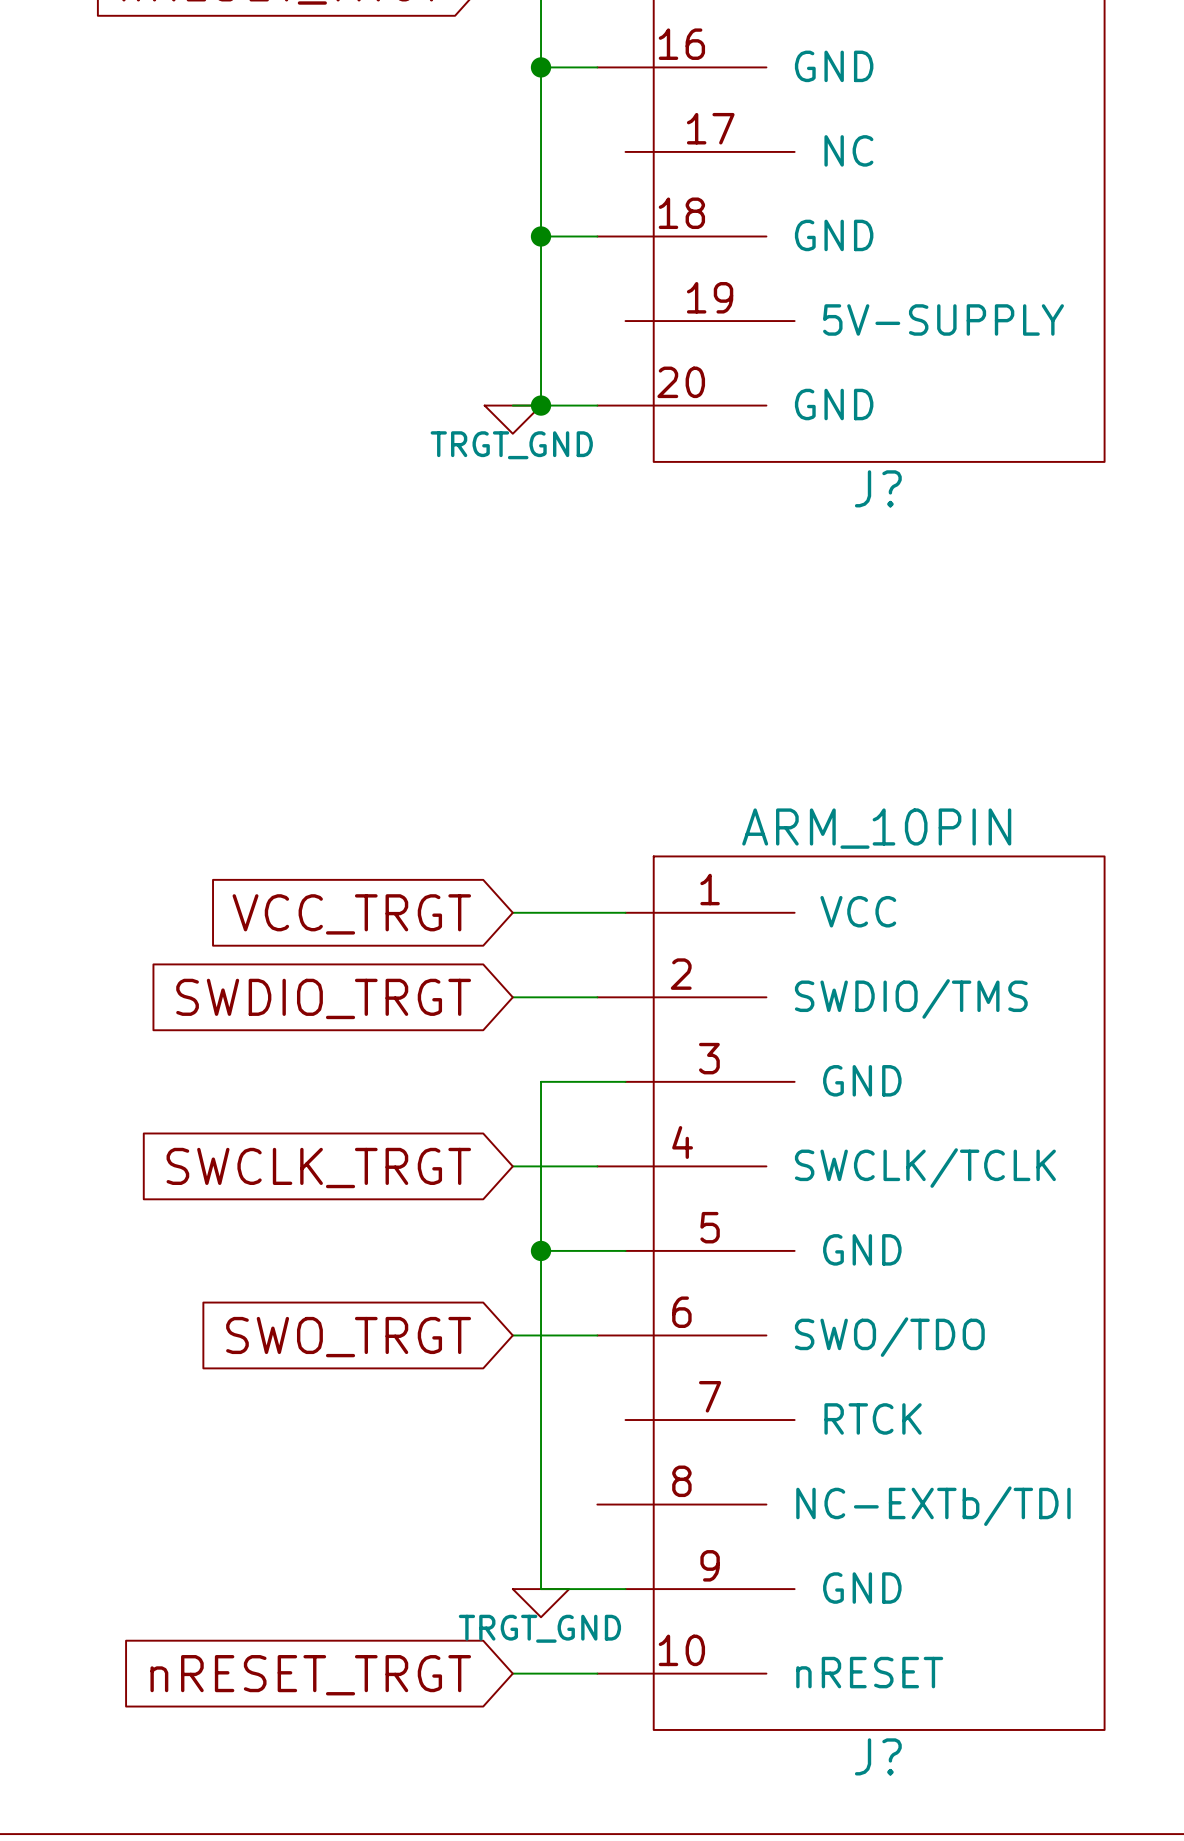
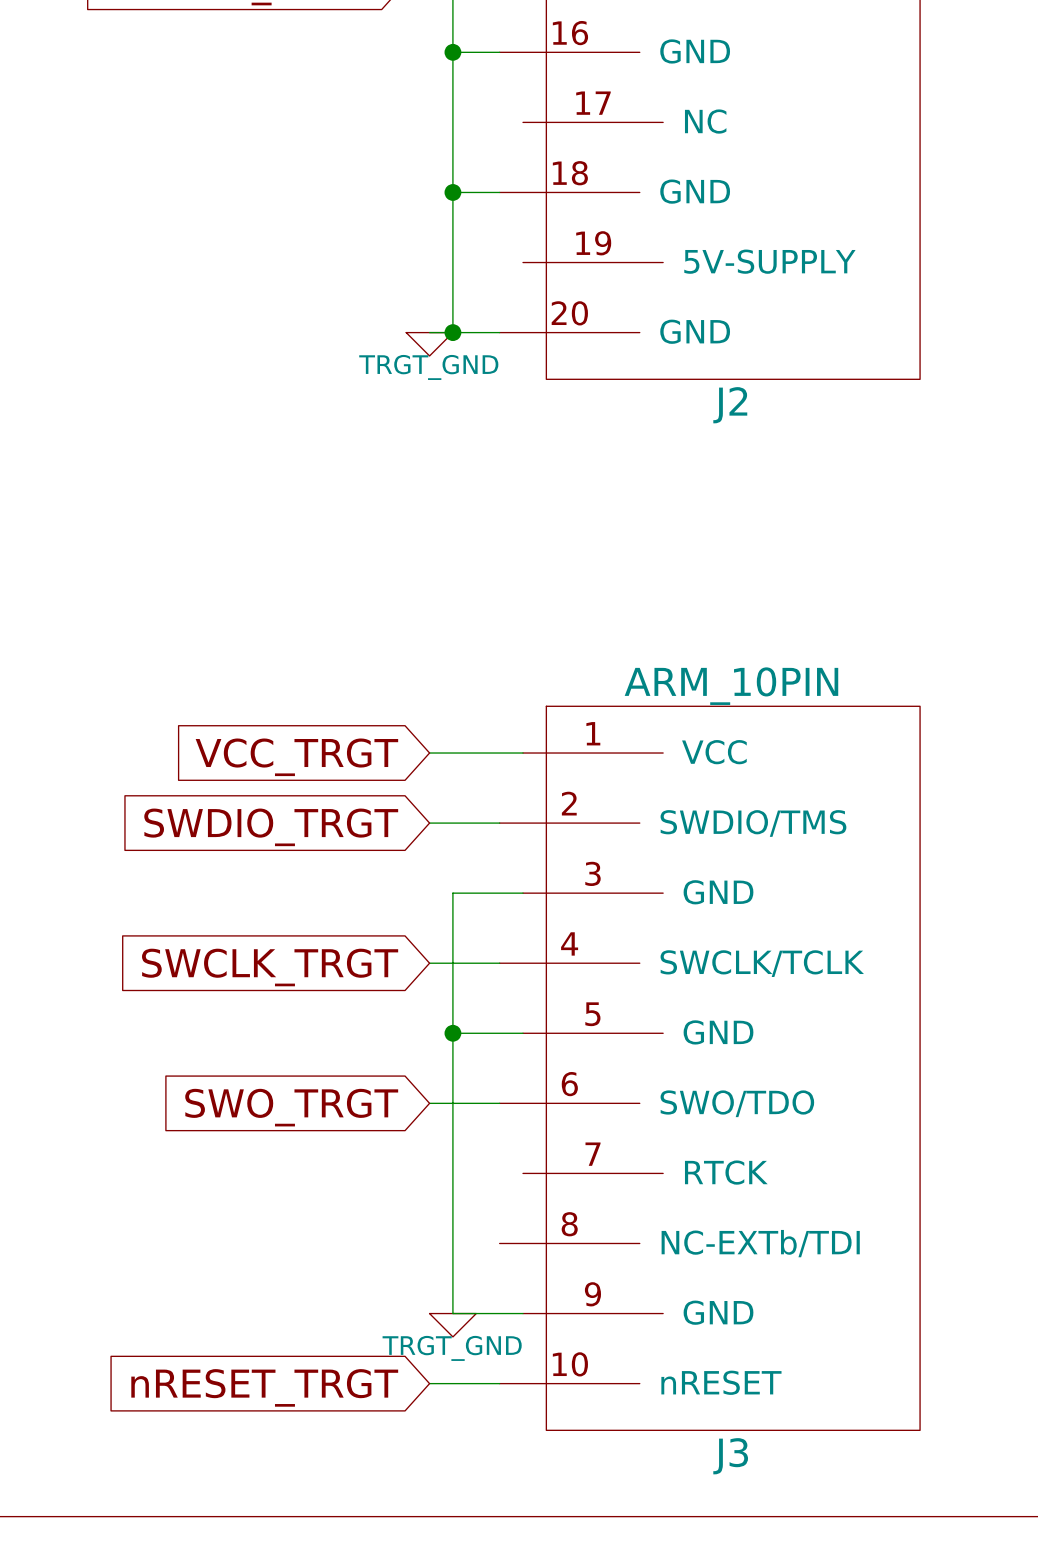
J? name: J? (878, 488) -> J2 (730, 405)
J? name: J? (878, 1756) -> J3 (730, 1456)

